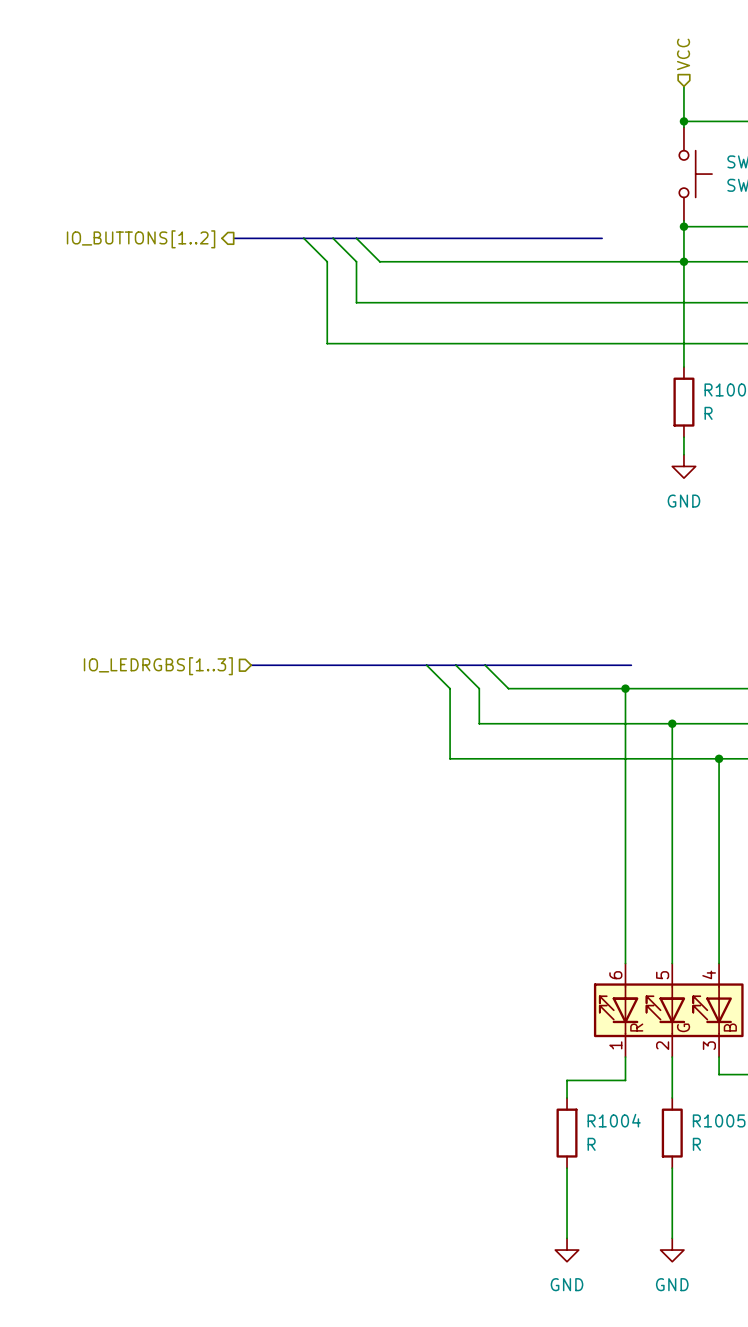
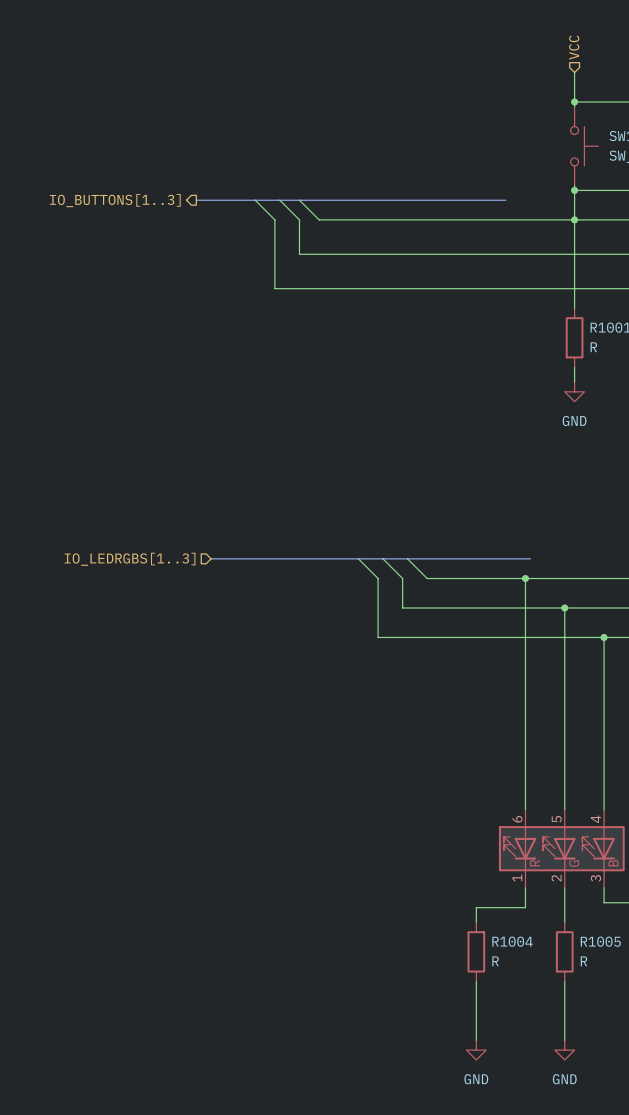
hierarchical label: IO_BUTTONS[1..2] (141, 239) -> IO_BUTTONS[1..3] (115, 200)

